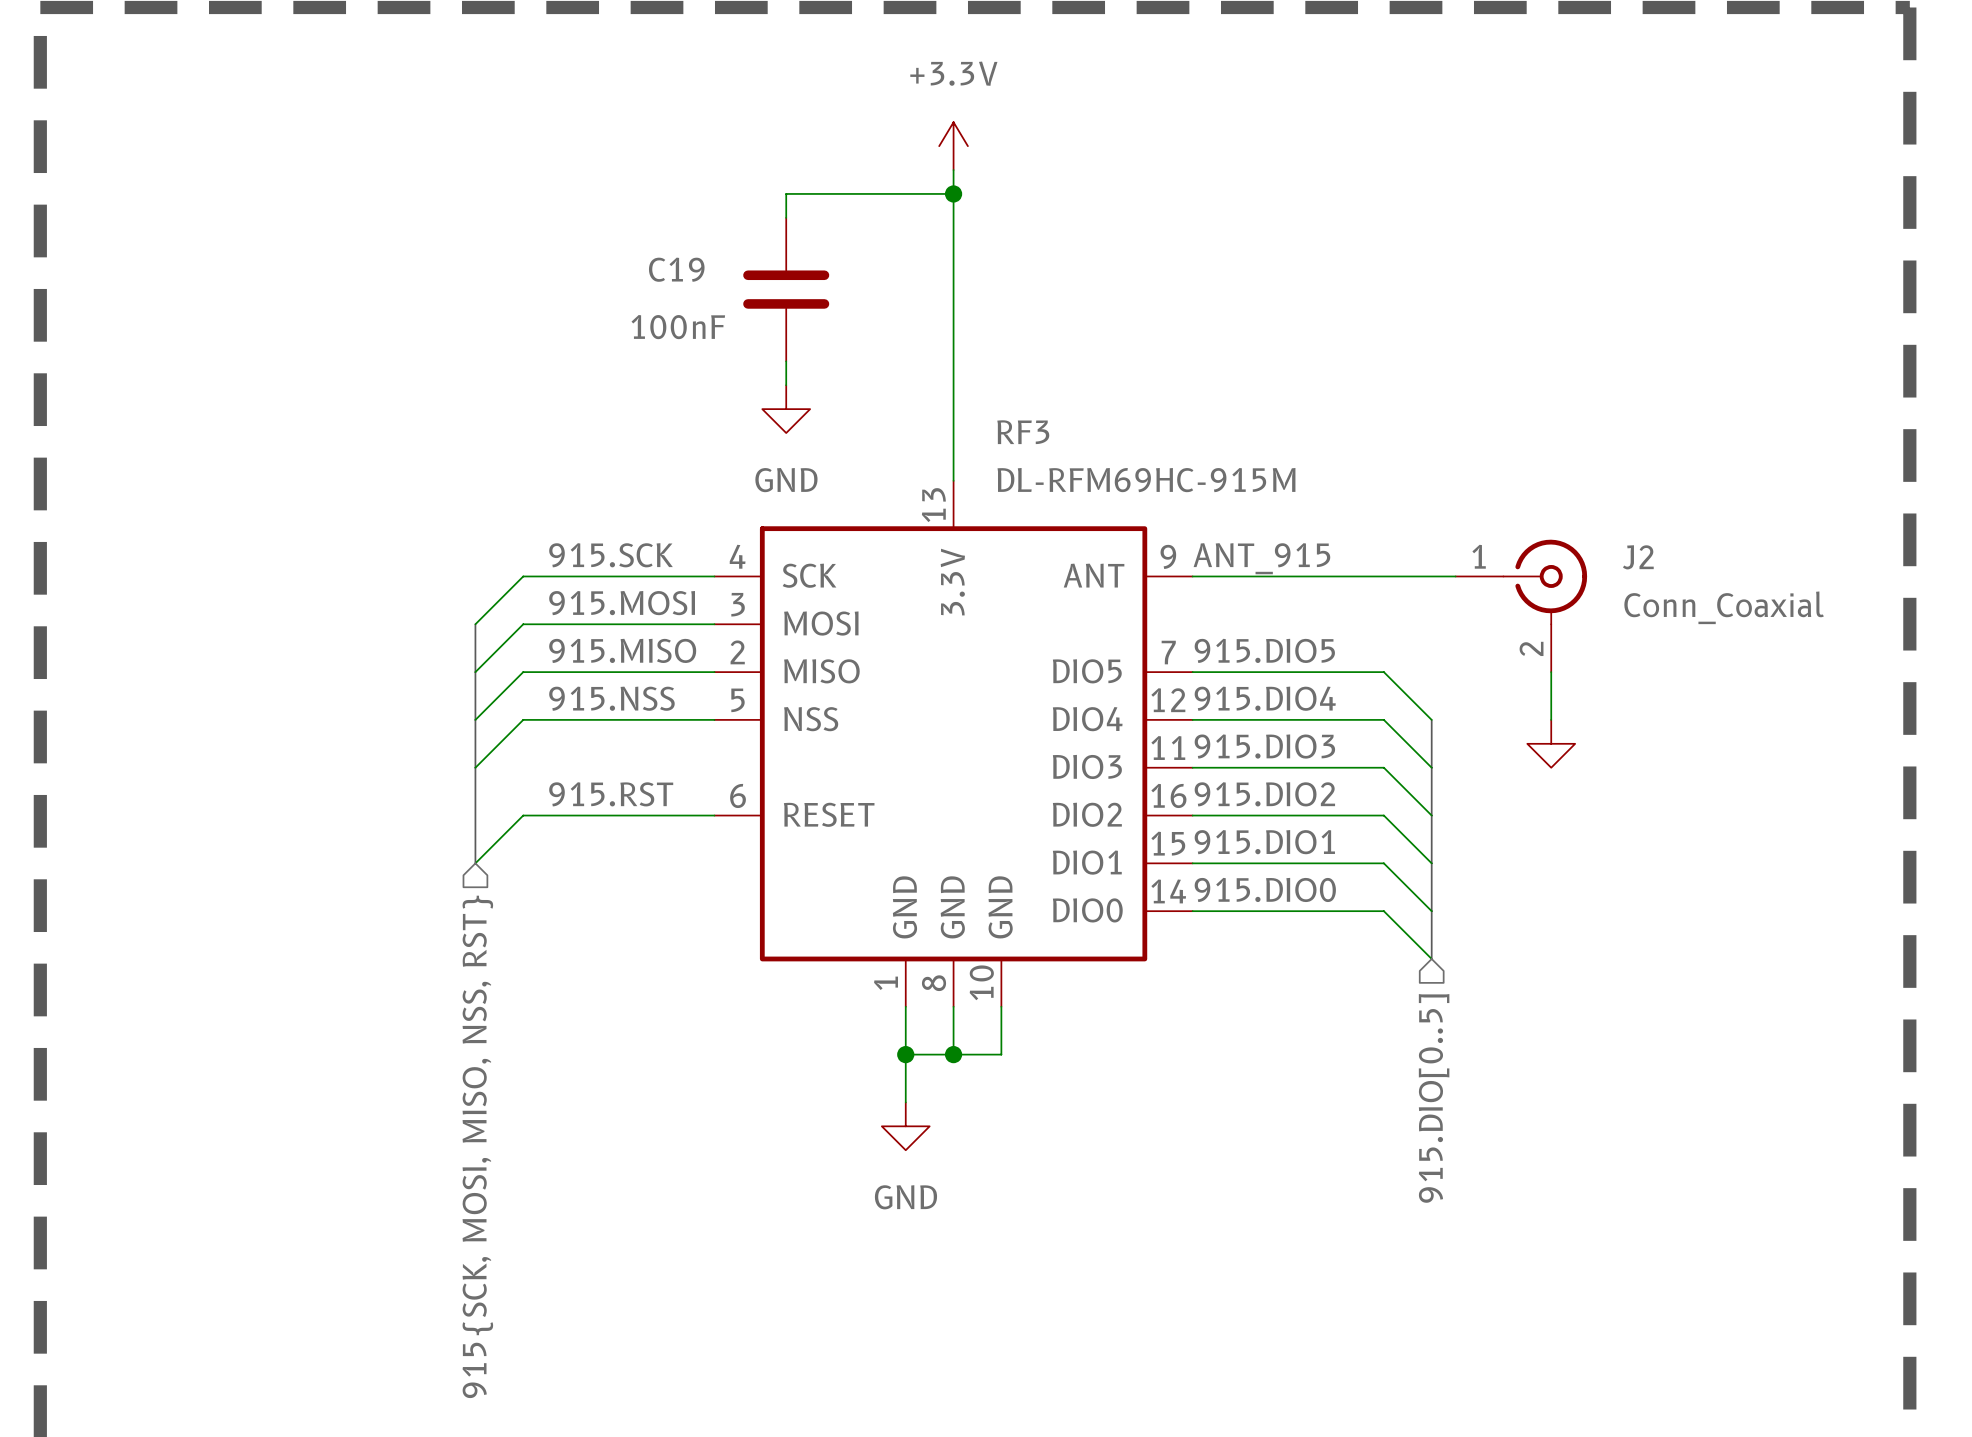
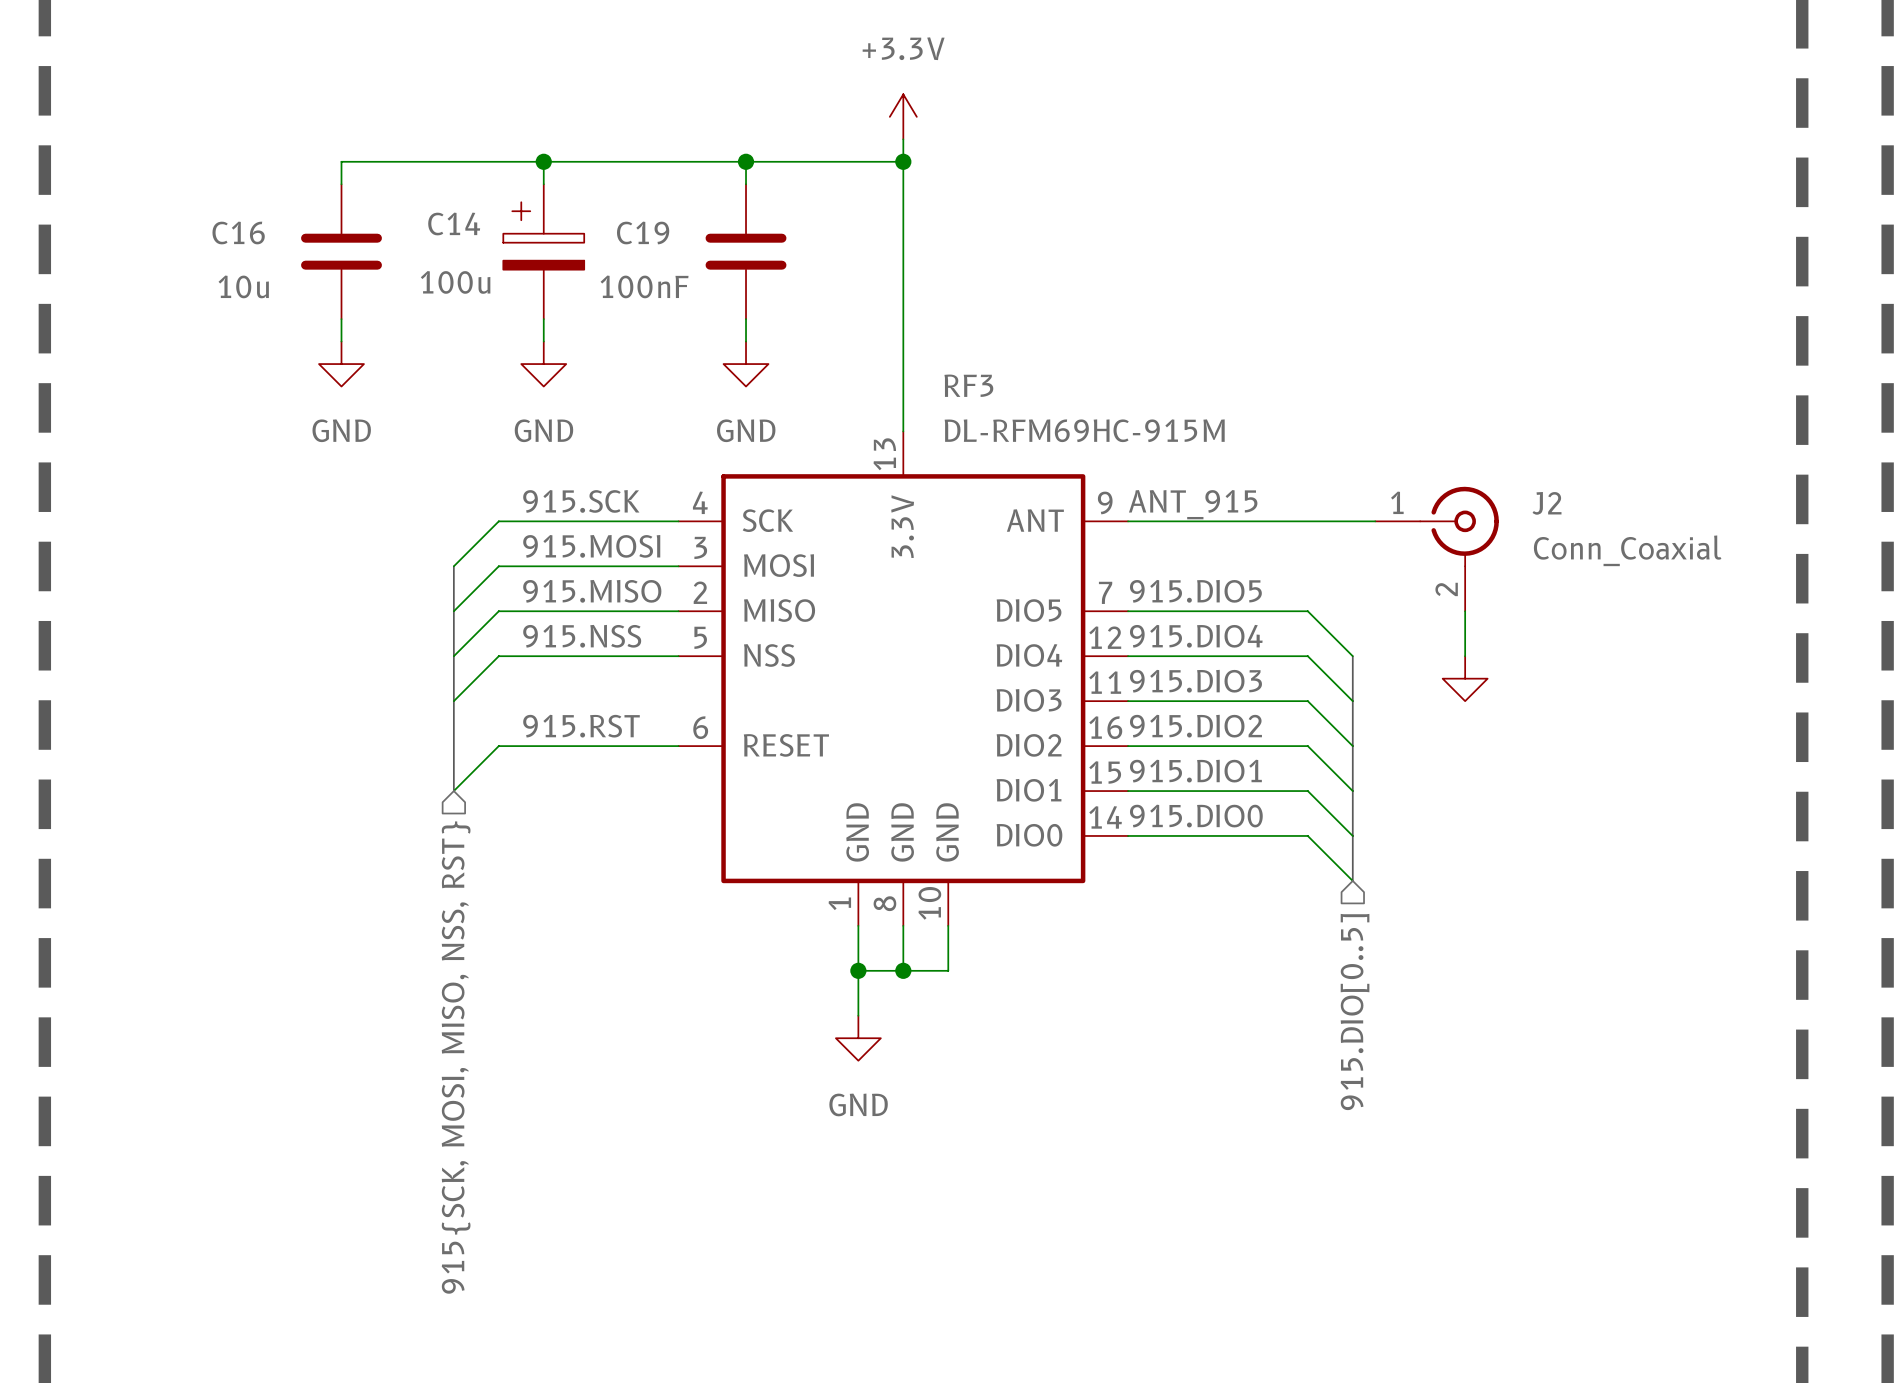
wire: none -> (543, 161) (543, 184)
junction: none -> (543, 161)
wire: none -> (746, 161) (341, 161) (341, 184)
junction: none -> (746, 161)
C16: none -> 10u (341, 251)
C14: none -> 100u (543, 251)
wire: none -> (341, 319) (341, 341)
wire: none -> (543, 319) (543, 341)
power symbol: none -> GND (341, 364)
power symbol: none -> GND (543, 364)

